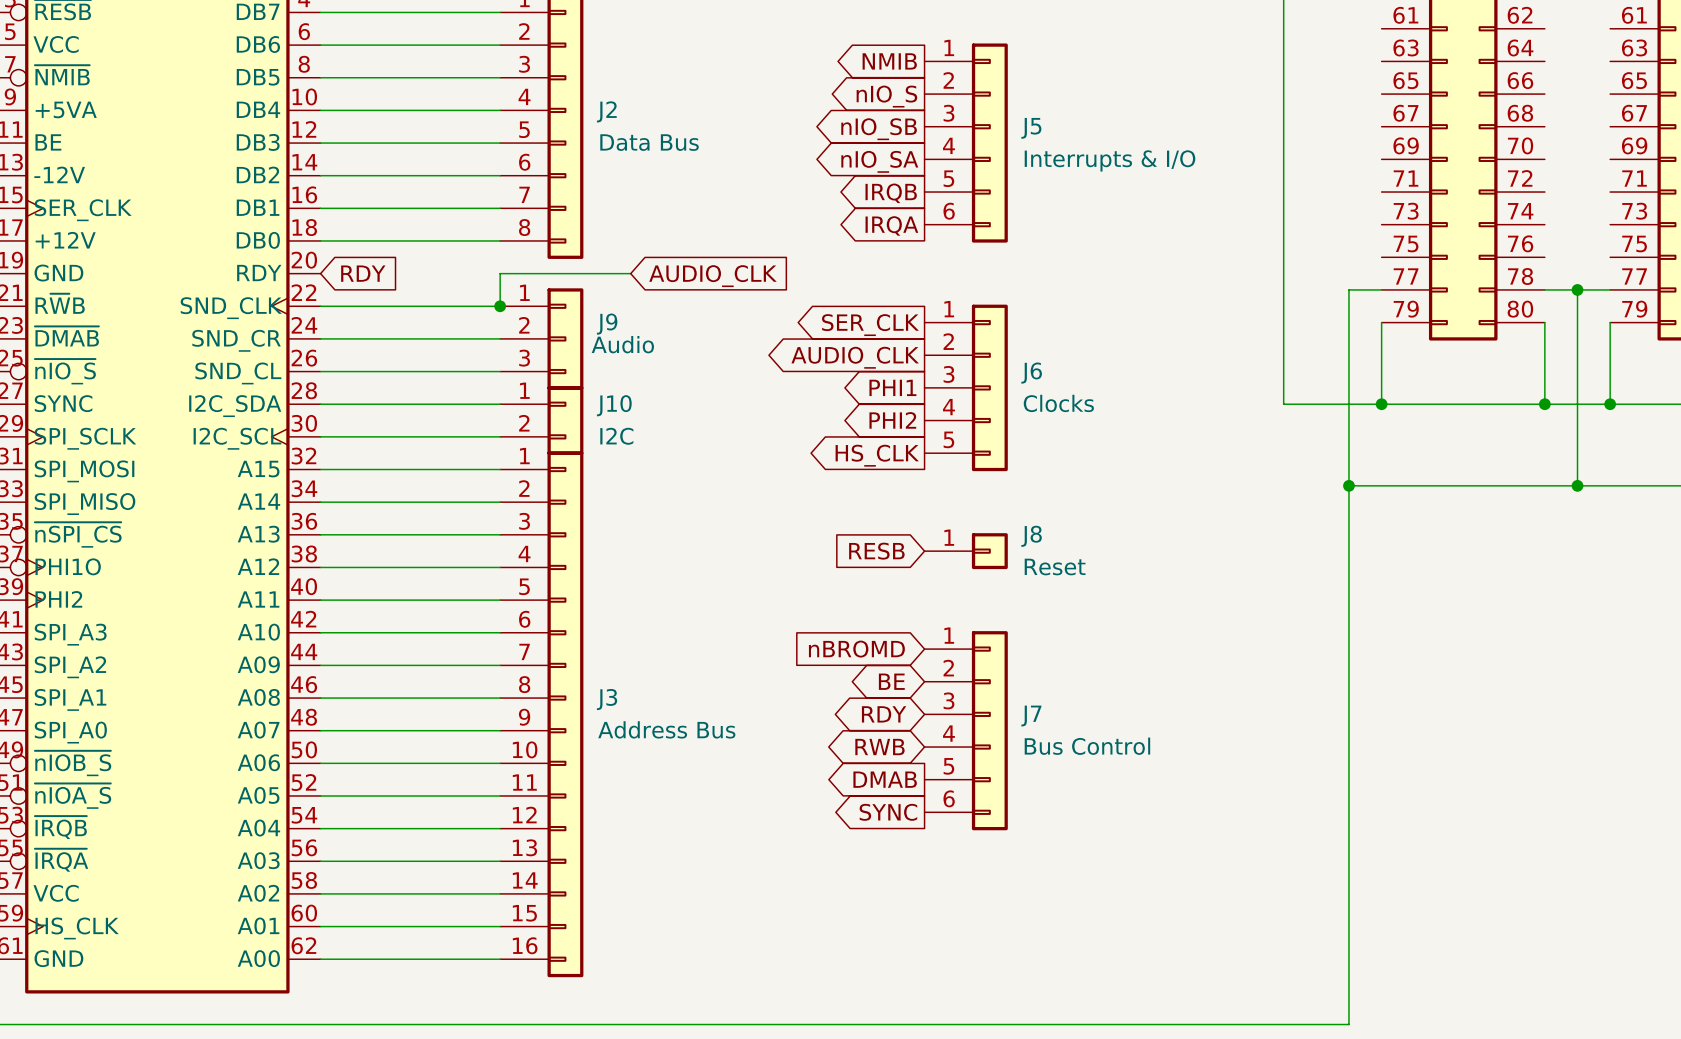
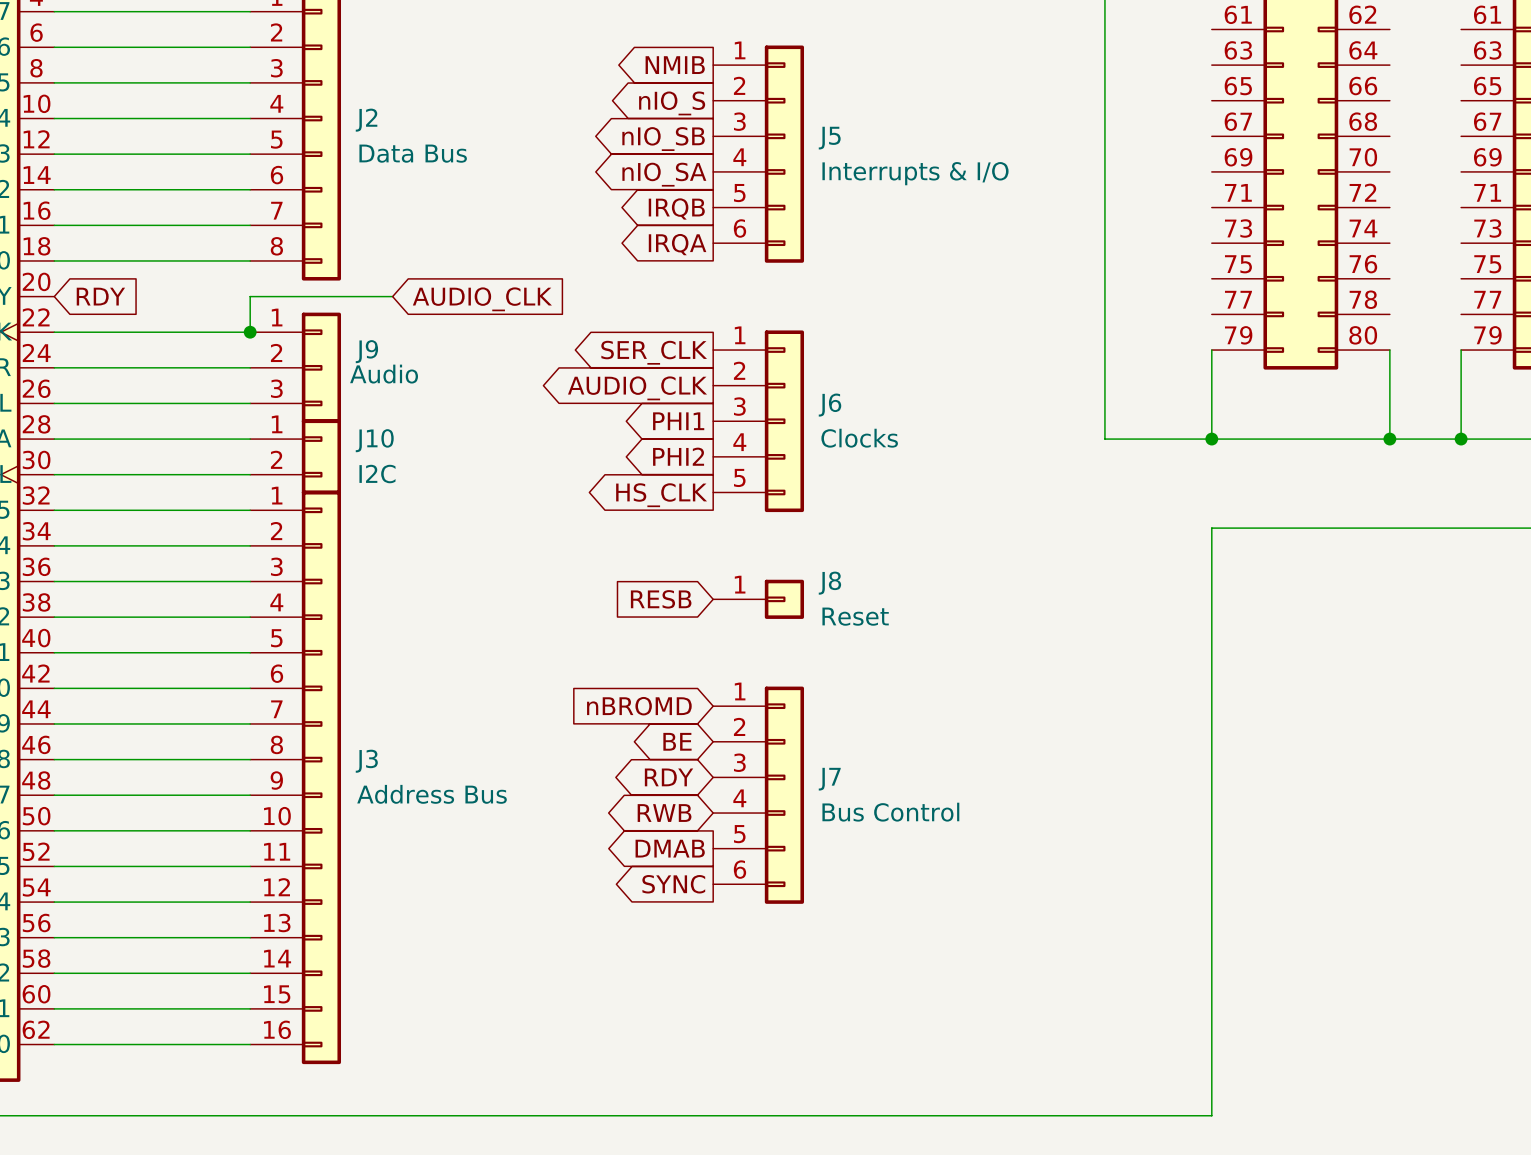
wire: (1381, 289) (1348, 289) (1348, 1024) -> (1211, 528) (1211, 1115) (1176, 1115)
wire: (1544, 289) (1610, 289) -> none
wire: (1577, 289) (1577, 485) -> none
junction: (1577, 289) -> none
wire: (1348, 485) (1381, 485) -> none
junction: (1348, 485) -> none
junction: (1577, 485) -> none

